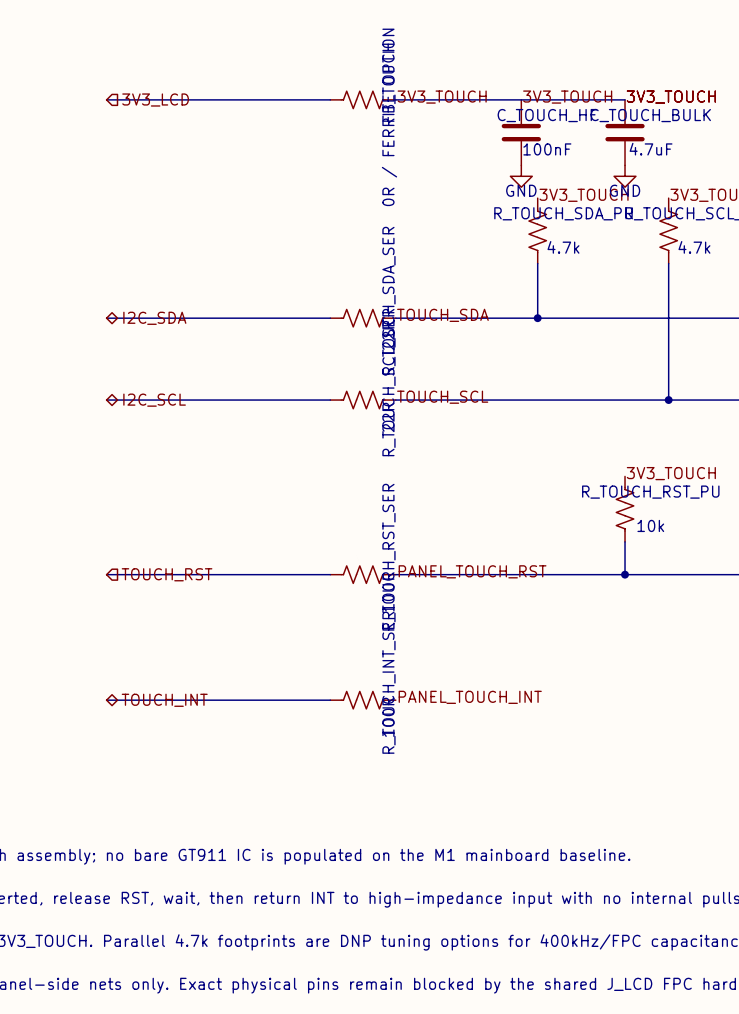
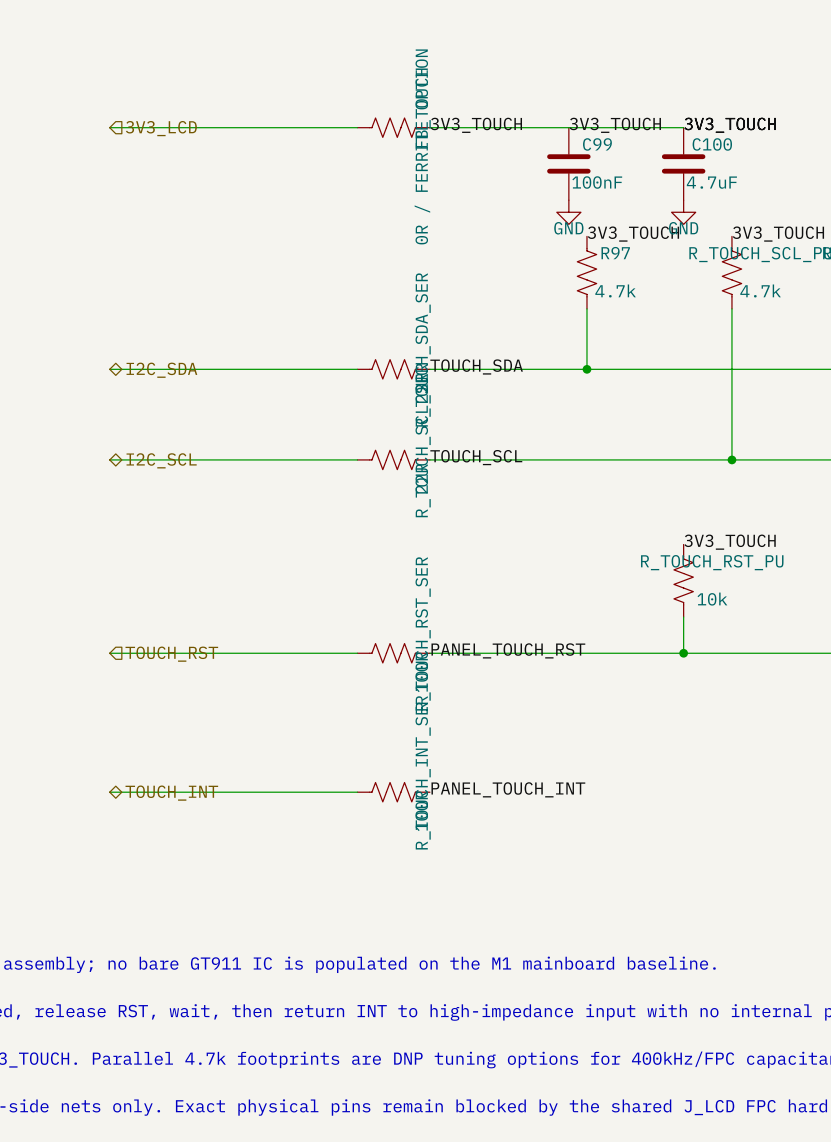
C_TOUCH_HF name: C_TOUCH_HF (547, 115) -> C99 (597, 144)
C_TOUCH_BULK name: C_TOUCH_BULK (650, 115) -> C100 (712, 144)
R_TOUCH_SDA_PU name: R_TOUCH_SDA_PU (563, 213) -> R97 (615, 253)

